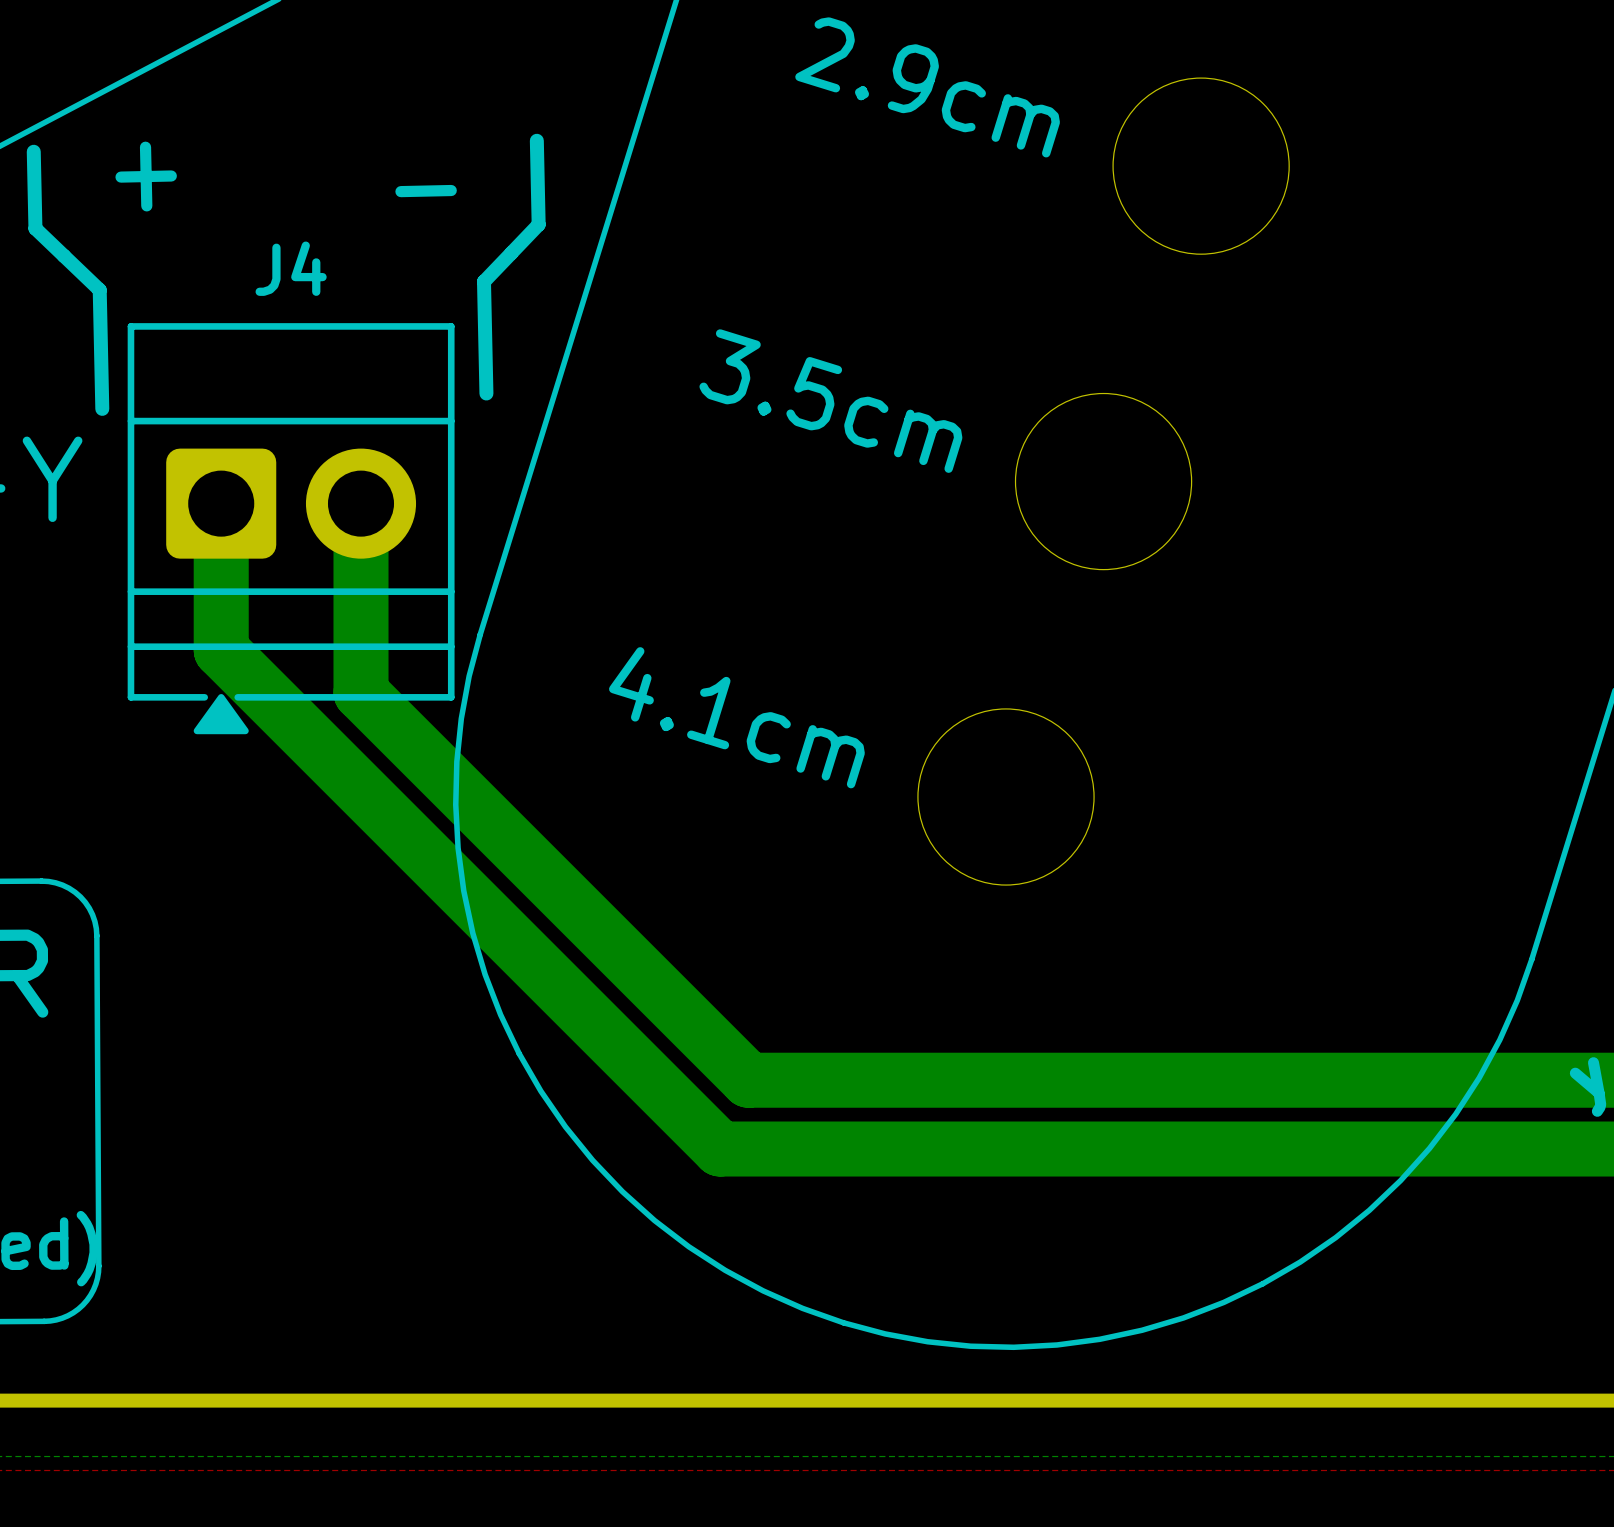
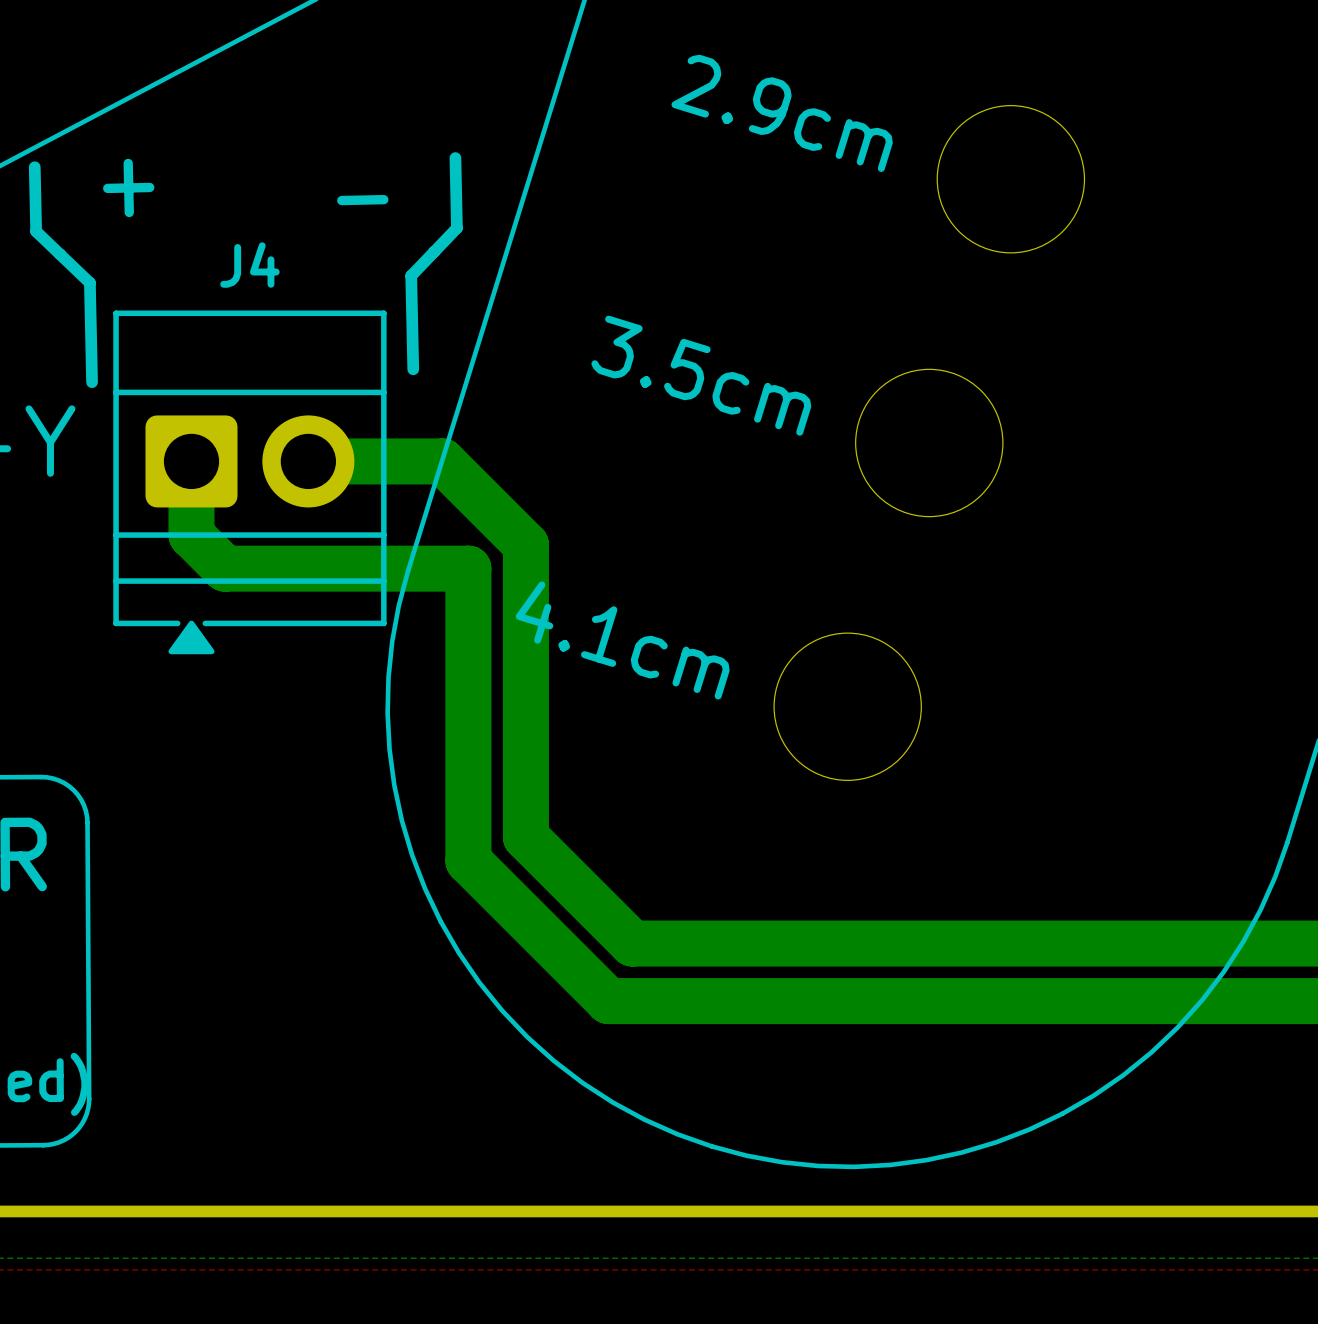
bottom track: (361, 503) (361, 692) (621, 952) -> (308, 461) (442, 461) (525, 544) (525, 837)
bottom track: (221, 591) (221, 650) (552, 981) -> (191, 535) (225, 568) (468, 568) (468, 860)

